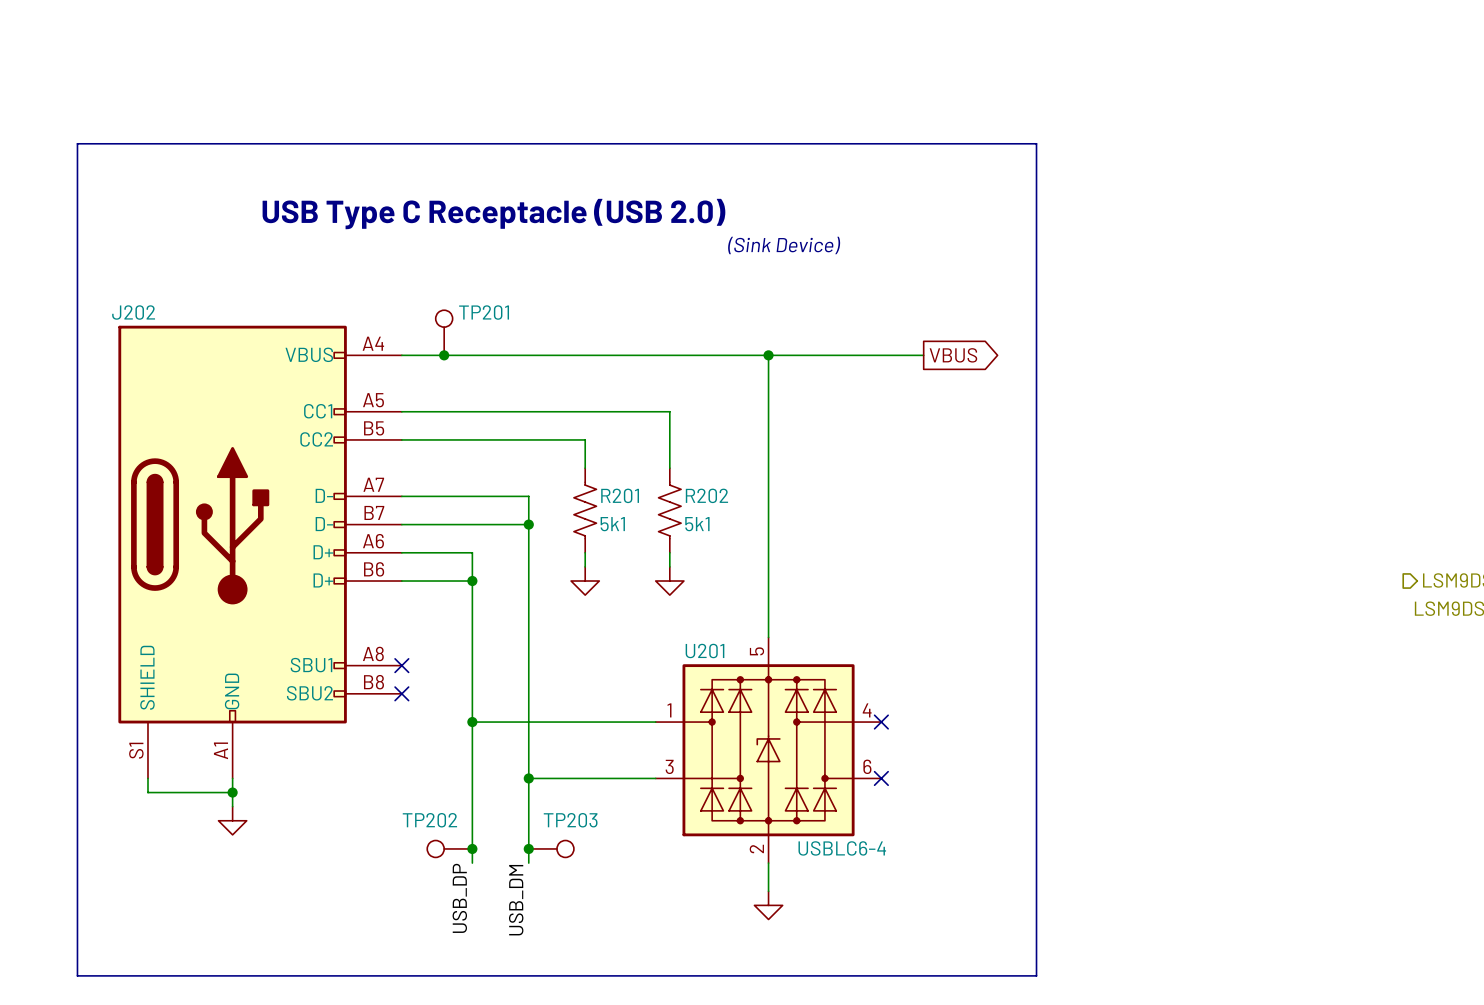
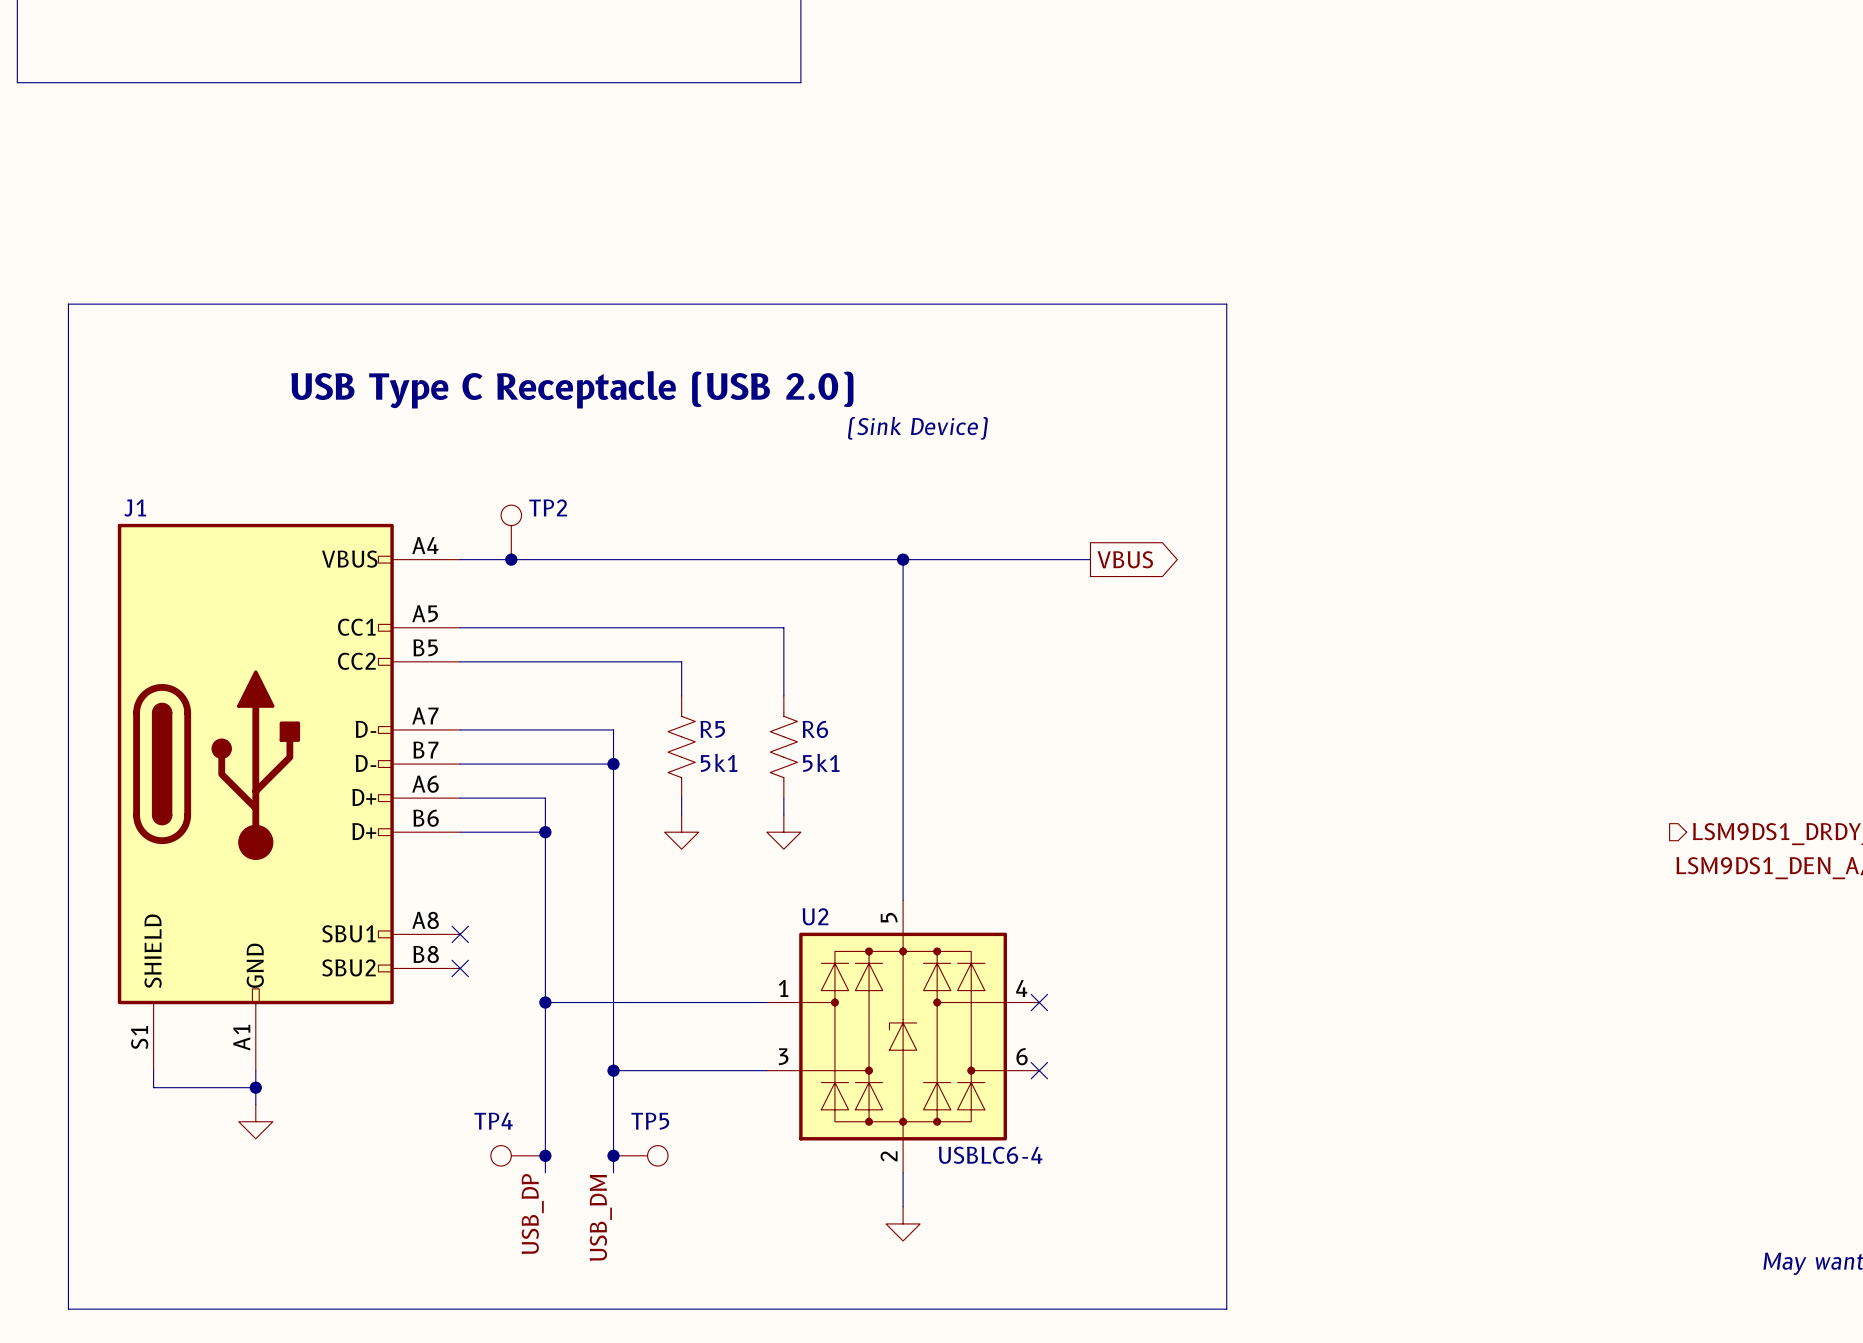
J202 name: J202 (133, 312) -> J1 (135, 507)
TP201 name: TP201 (484, 312) -> TP2 (548, 507)
R201 name: R201 (620, 495) -> R5 (712, 729)
R202 name: R202 (706, 495) -> R6 (815, 729)
U201 name: U201 (705, 651) -> U2 (815, 916)
TP202 name: TP202 (429, 820) -> TP4 (493, 1121)
TP203 name: TP203 (570, 820) -> TP5 (650, 1121)

